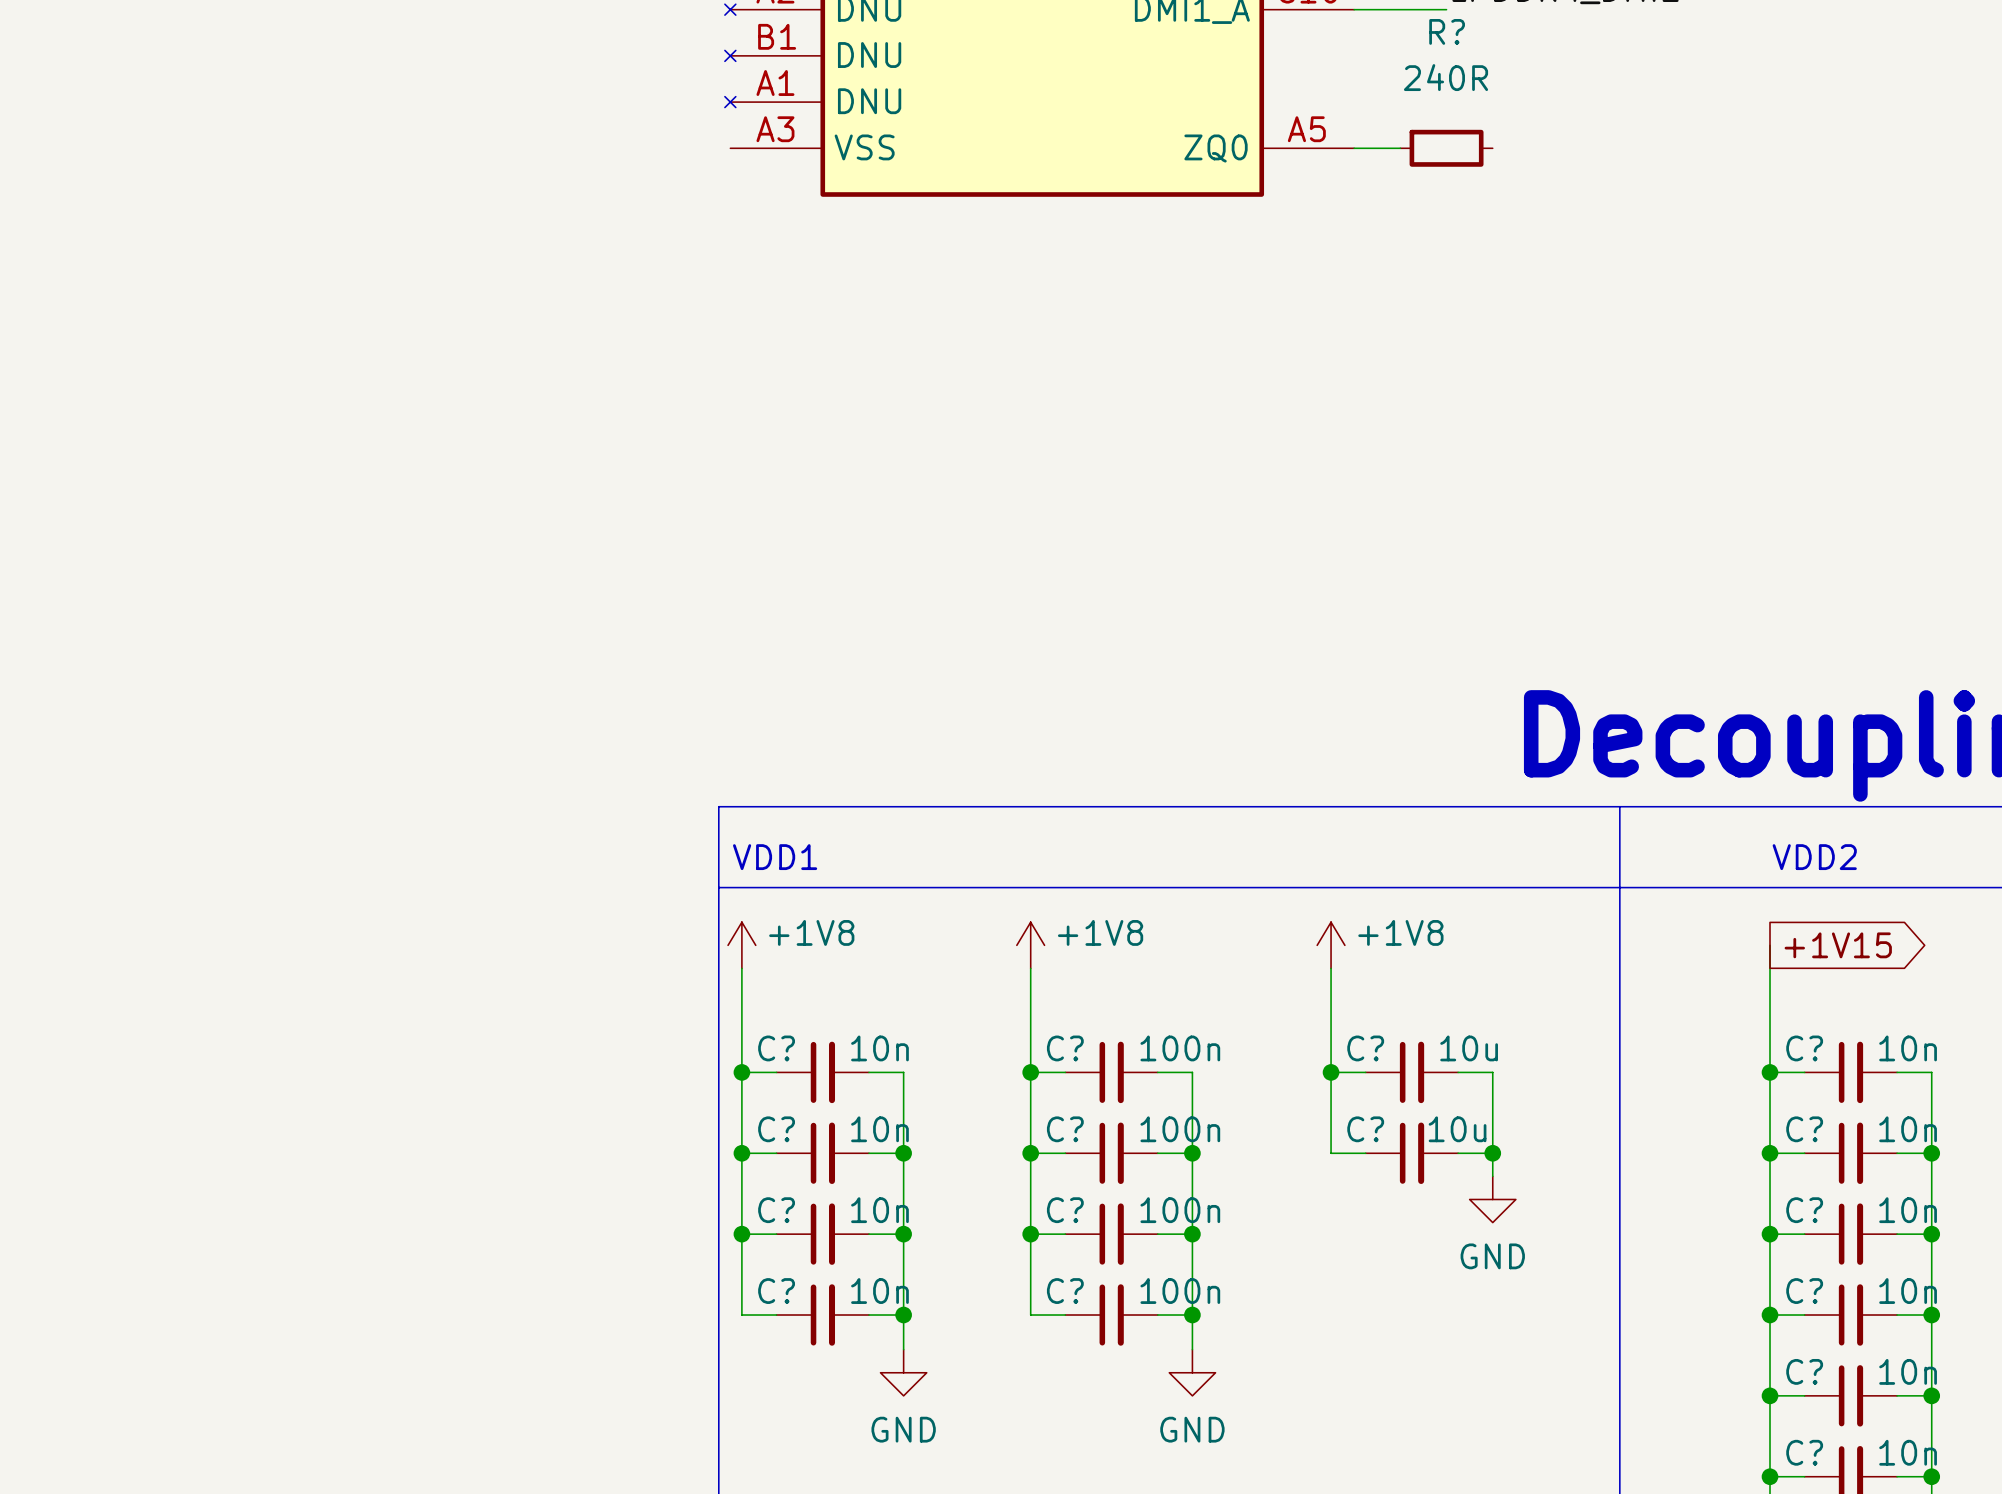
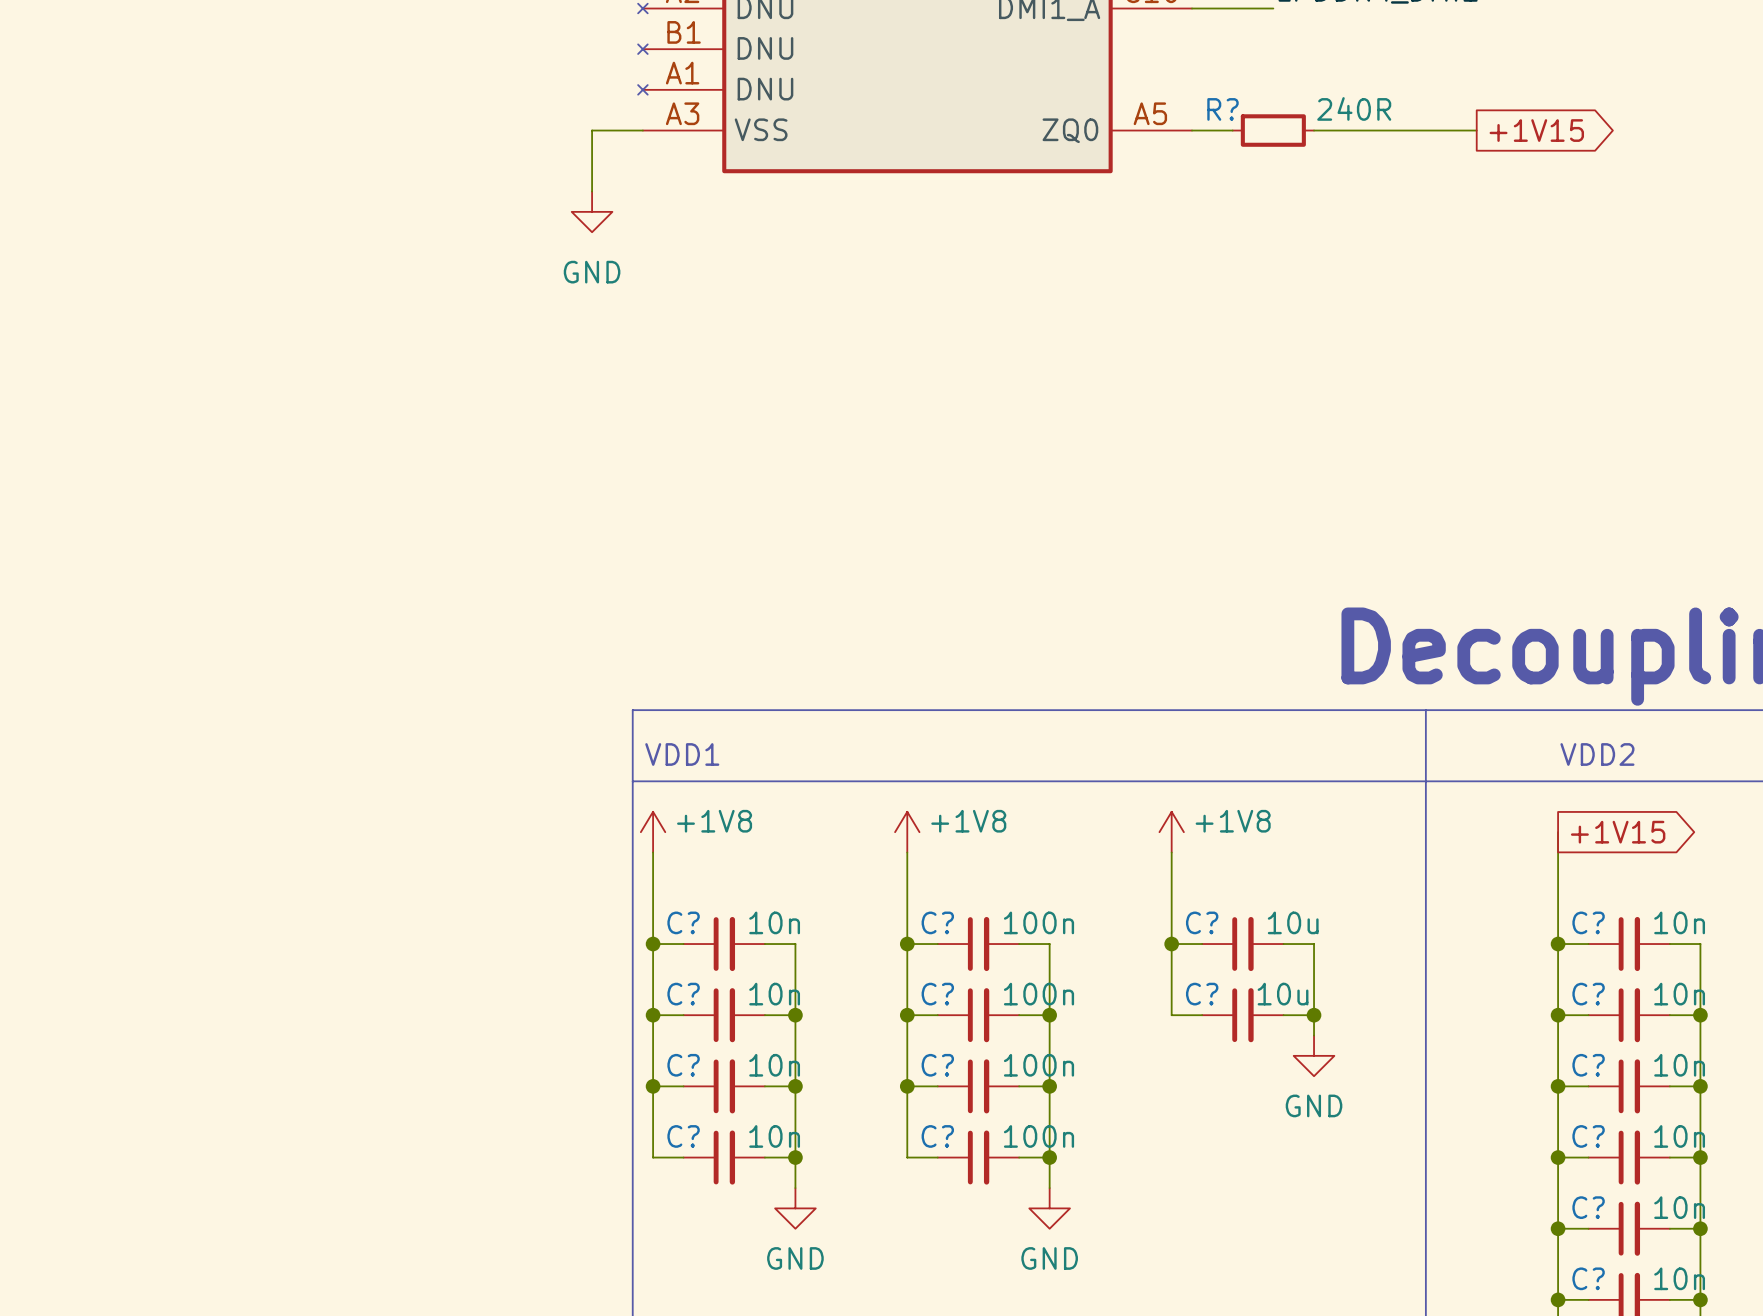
R? name position: R? (1447, 31) -> R? (1222, 109)
R? text position: 240R (1446, 77) -> 240R (1354, 108)
wire: none -> (642, 130) (592, 130) (592, 191)
wire: none -> (1314, 130) (1476, 130)
global label: none -> +1V15 (1536, 130)
power symbol: none -> GND (592, 211)

